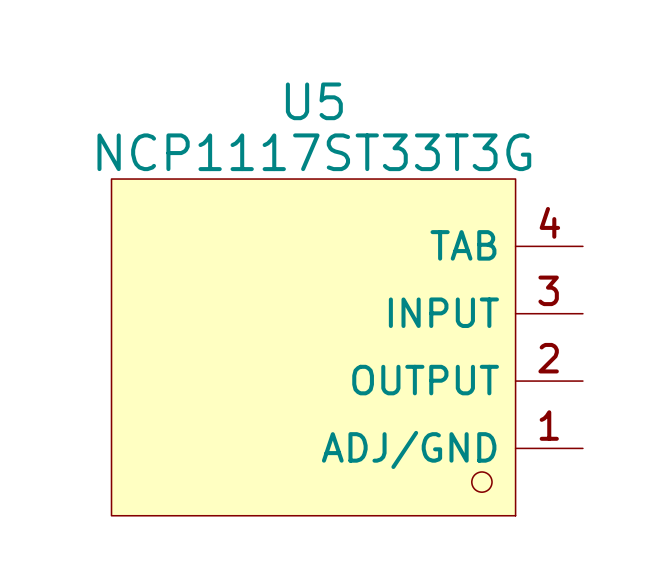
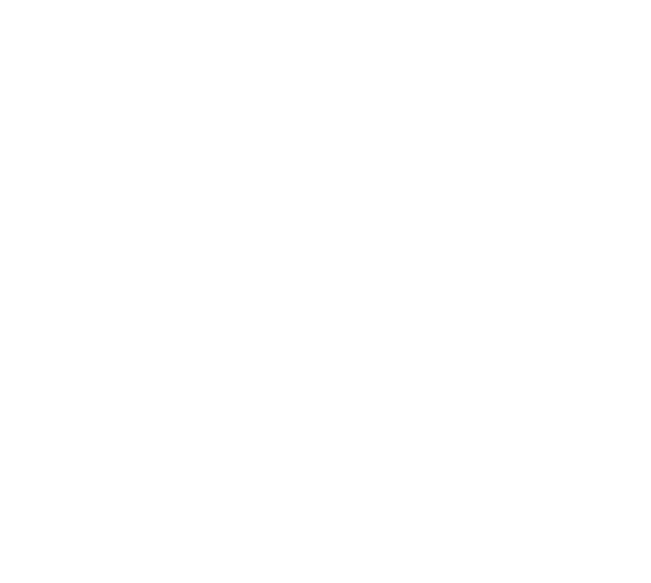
U5: NCP1117ST33T3G (347, 347) -> none

